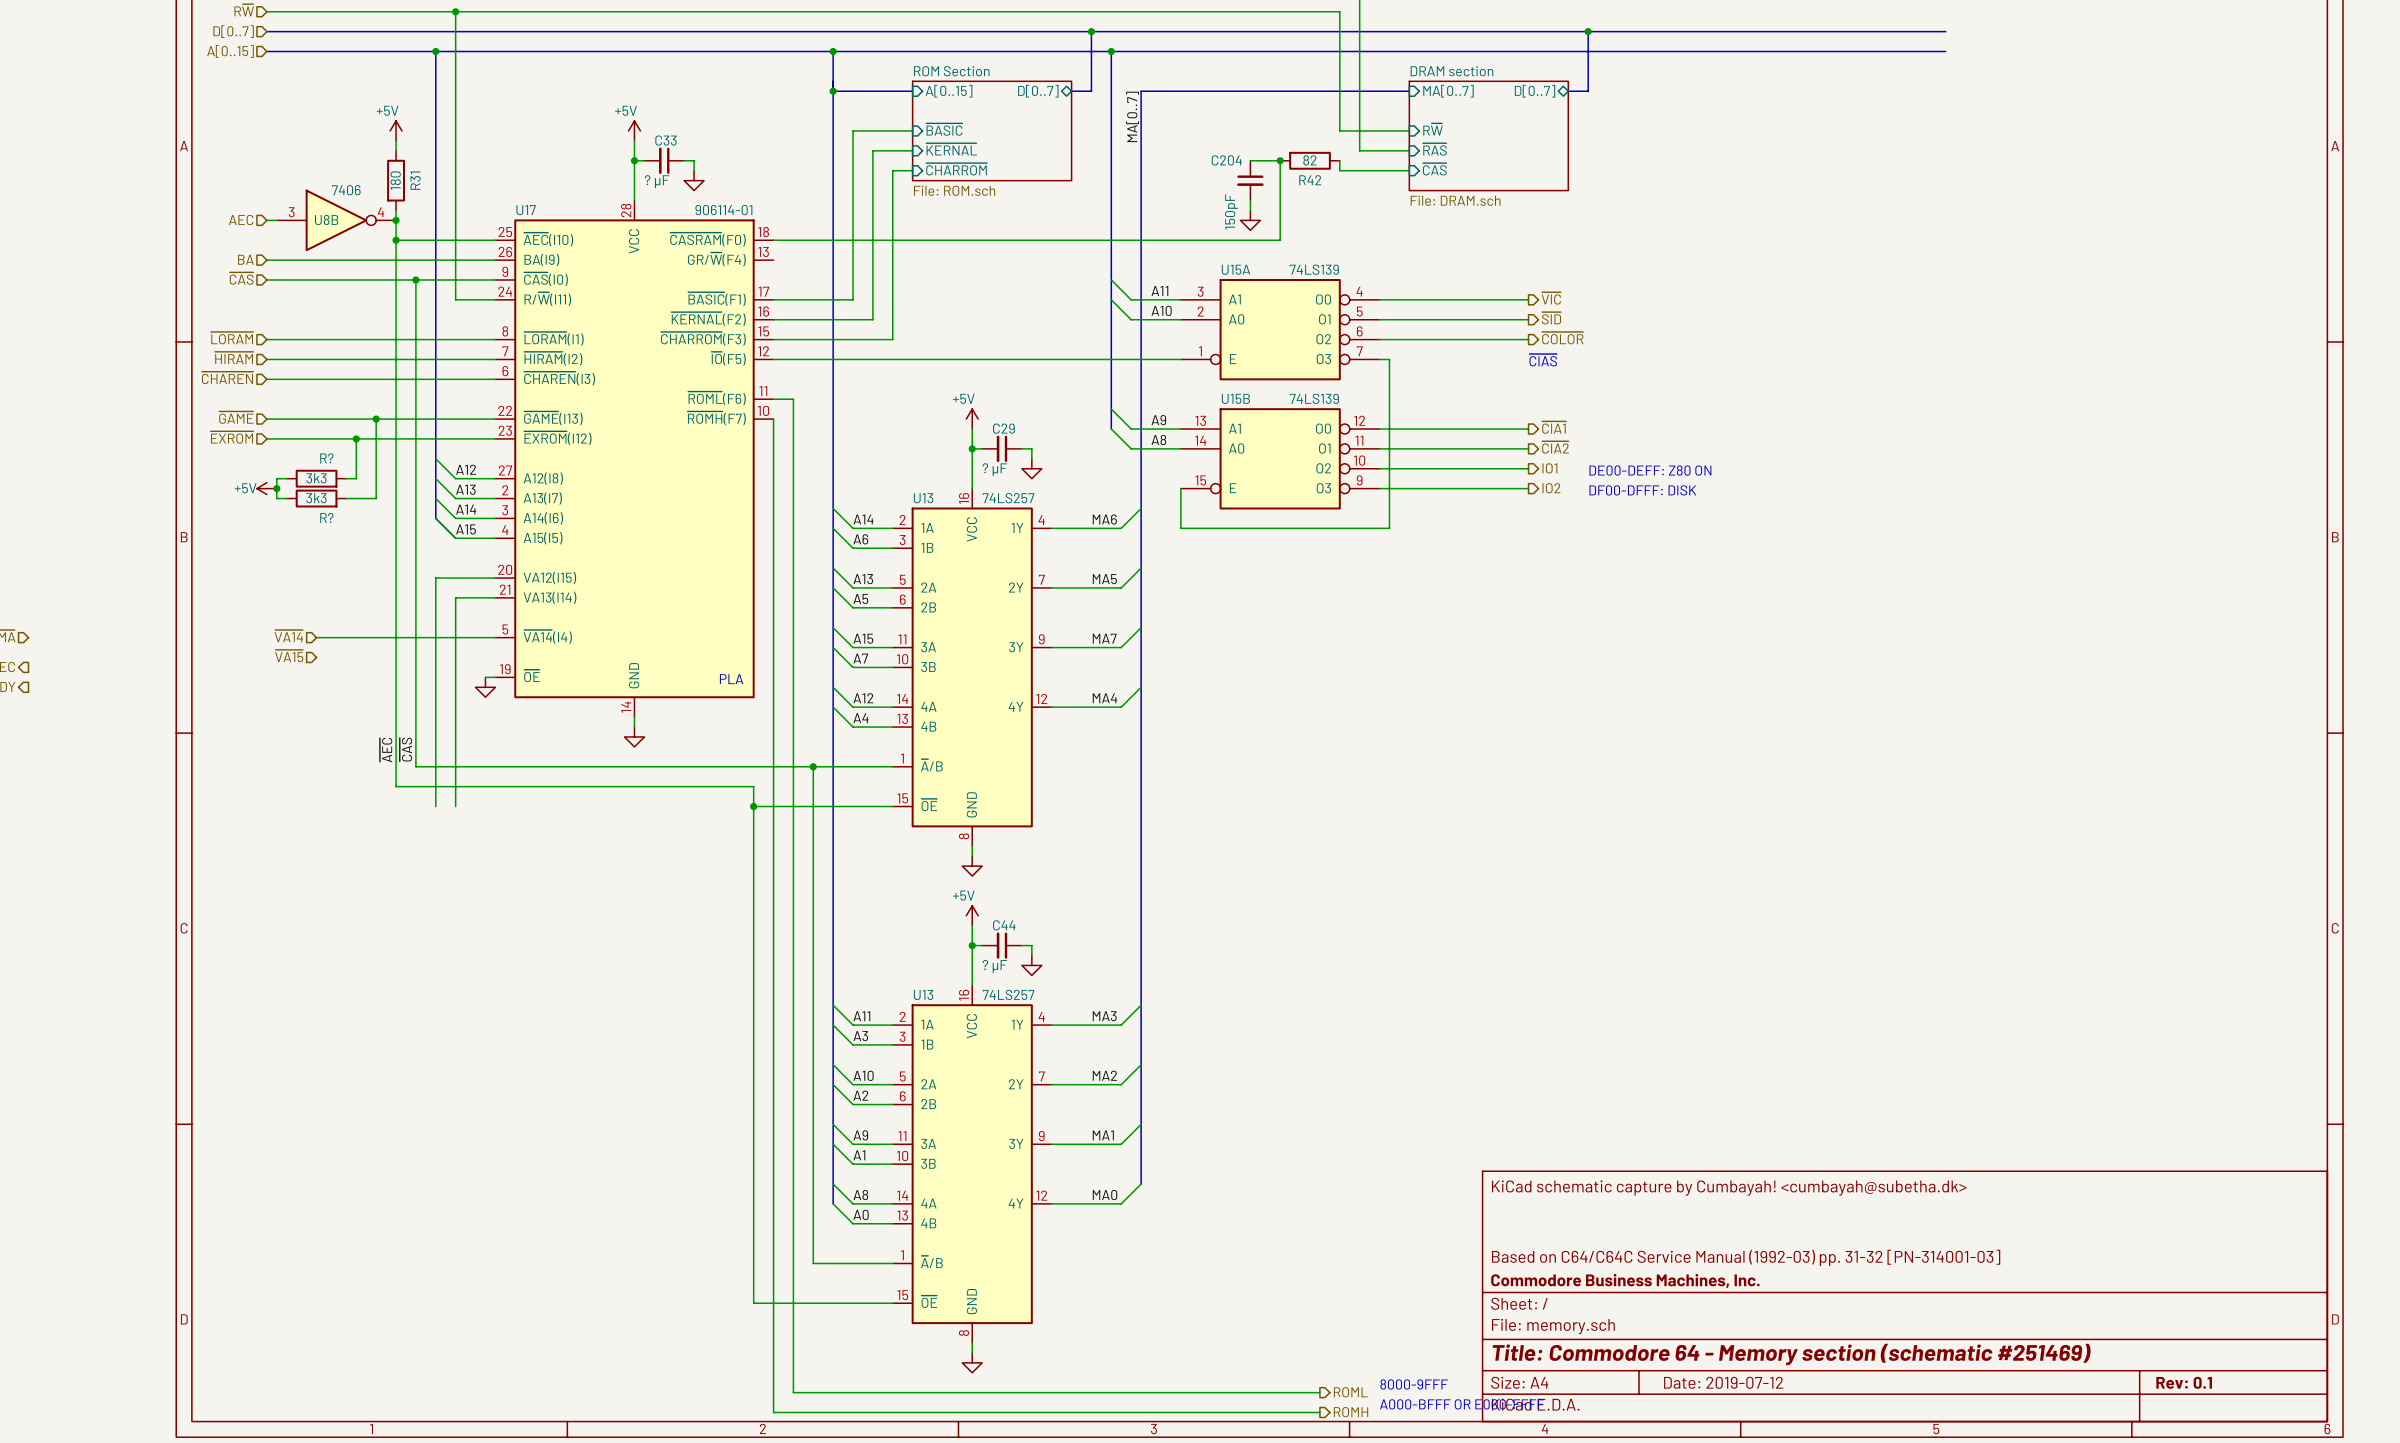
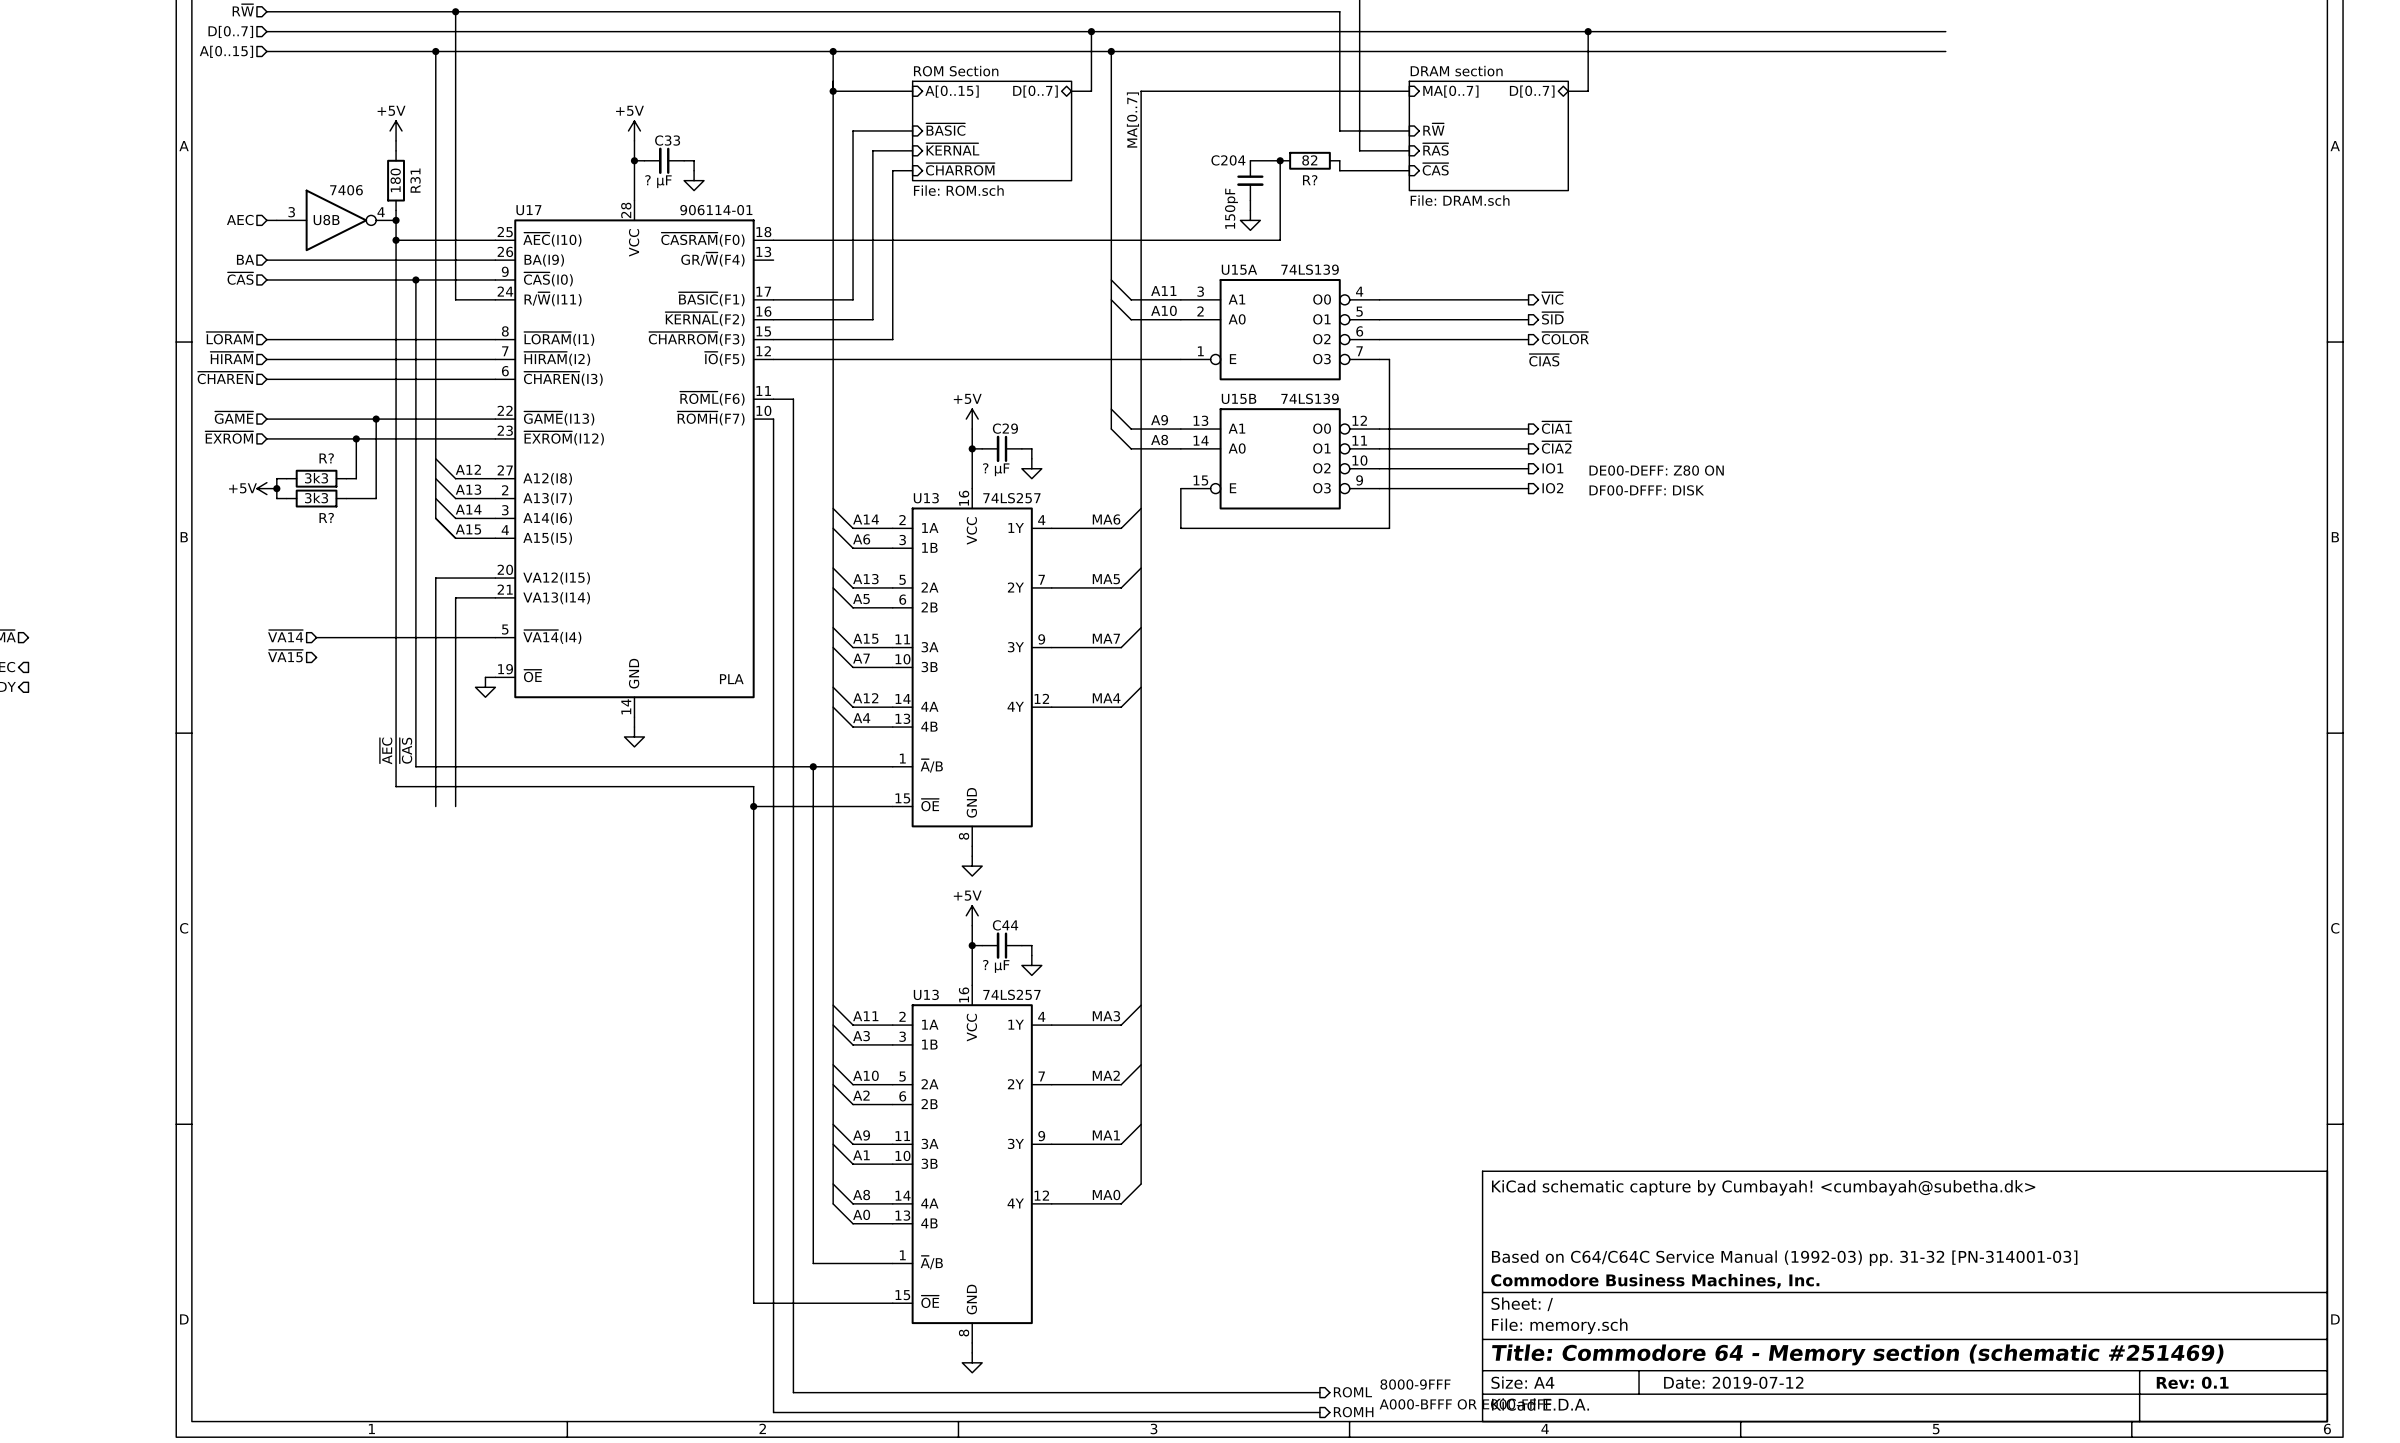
R42 name: R42 (1310, 180) -> R? (1310, 180)

